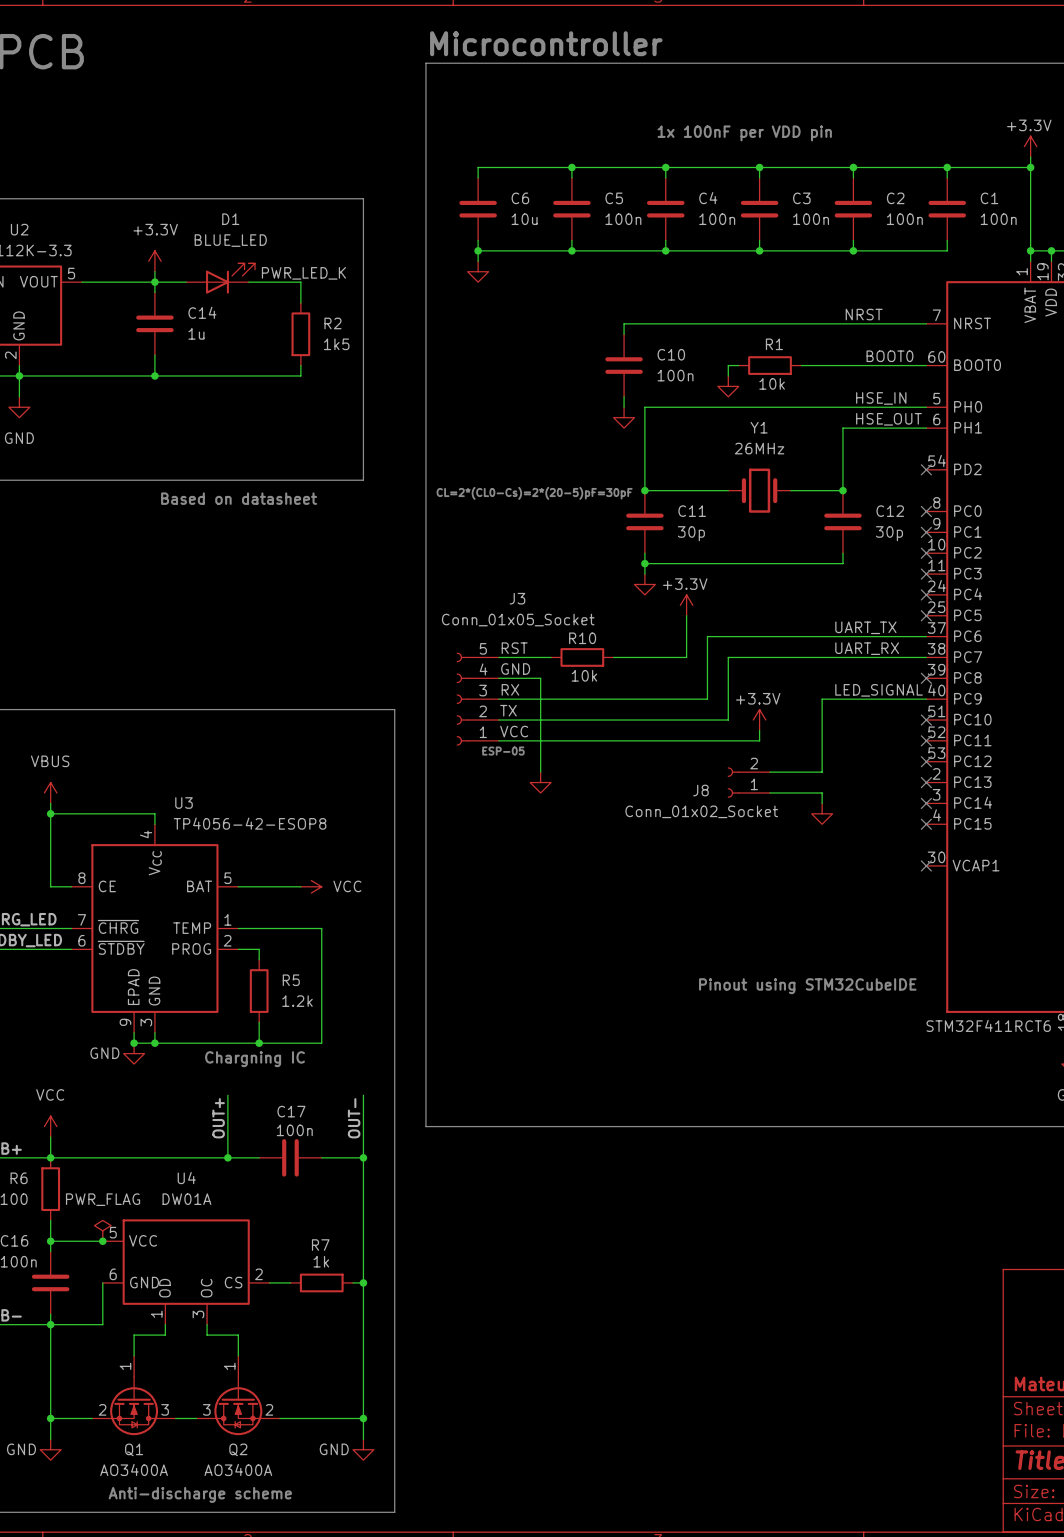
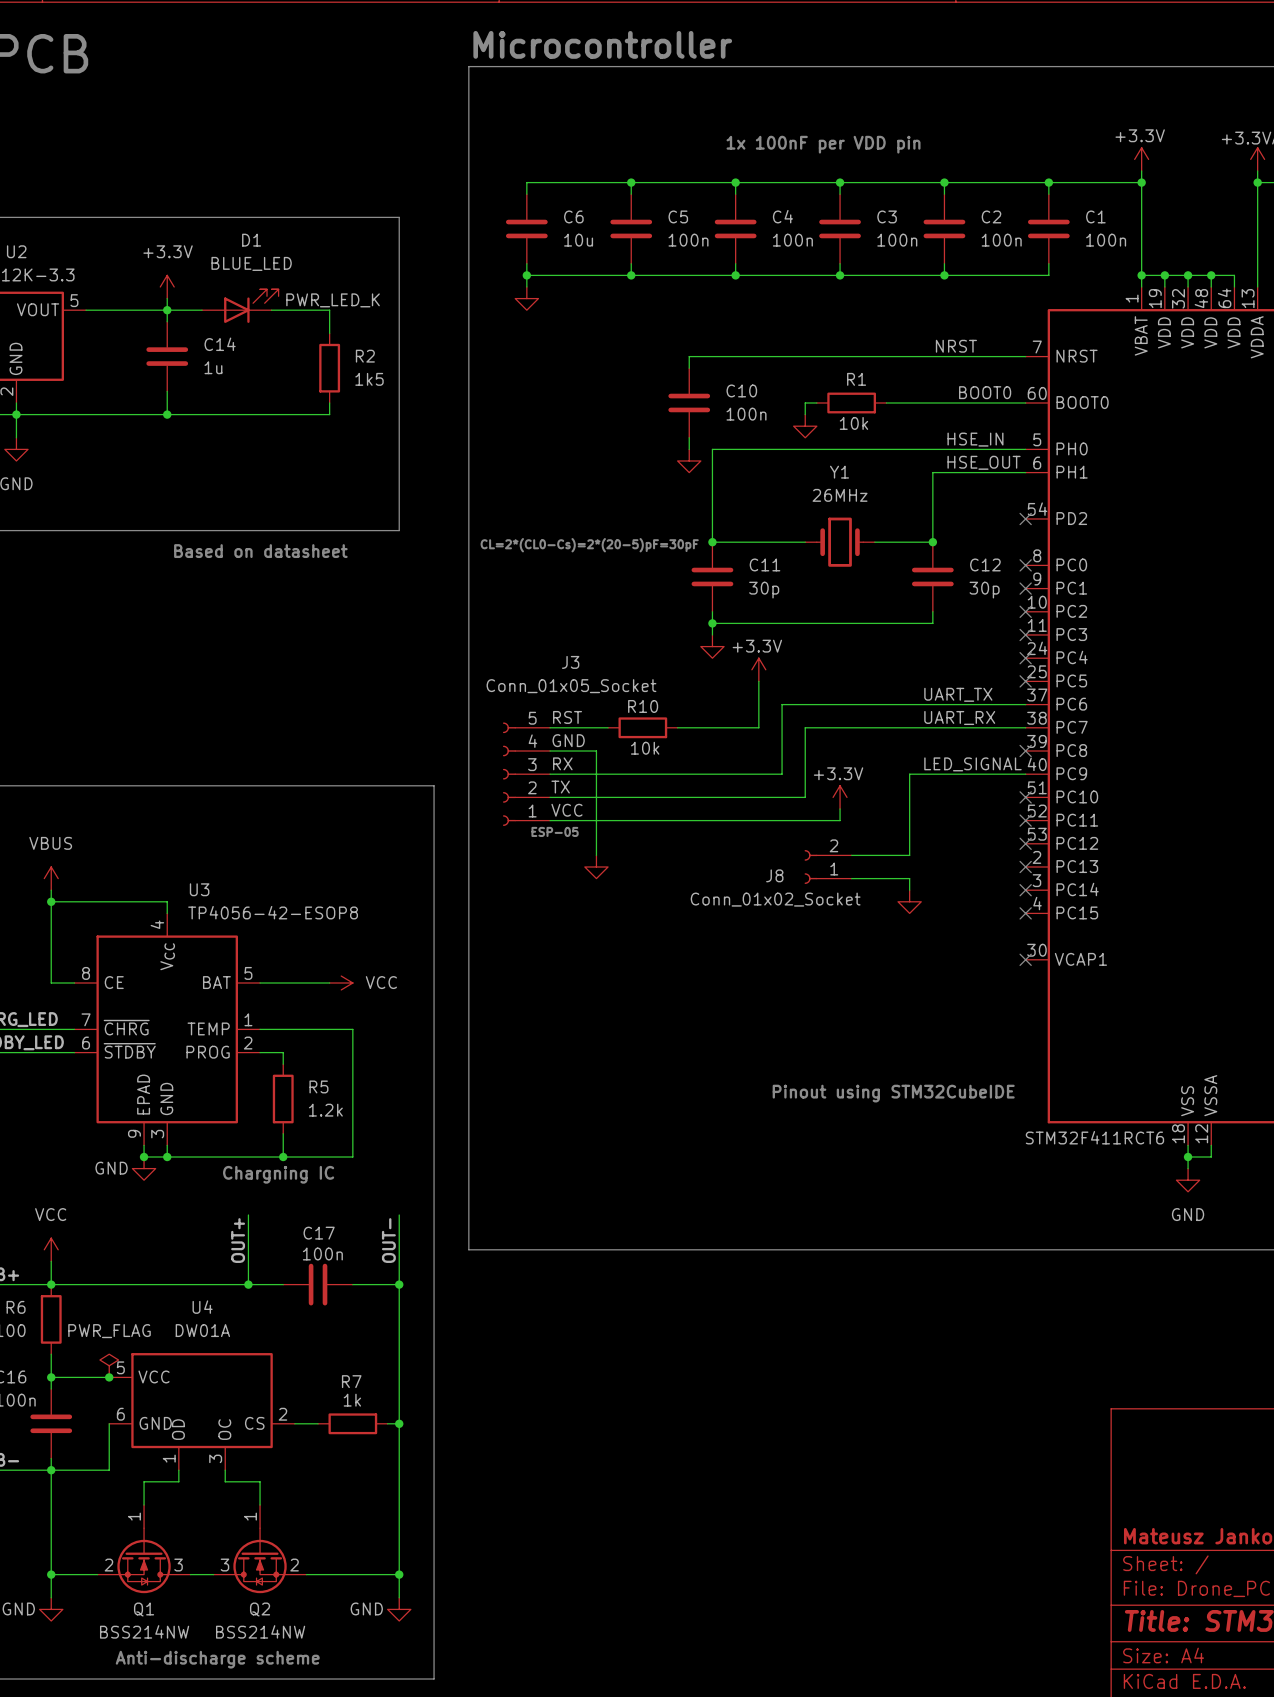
Q1 value: AO3400A (134, 1469) -> BSS214NW (144, 1631)
Q2 value: AO3400A (238, 1469) -> BSS214NW (260, 1631)

